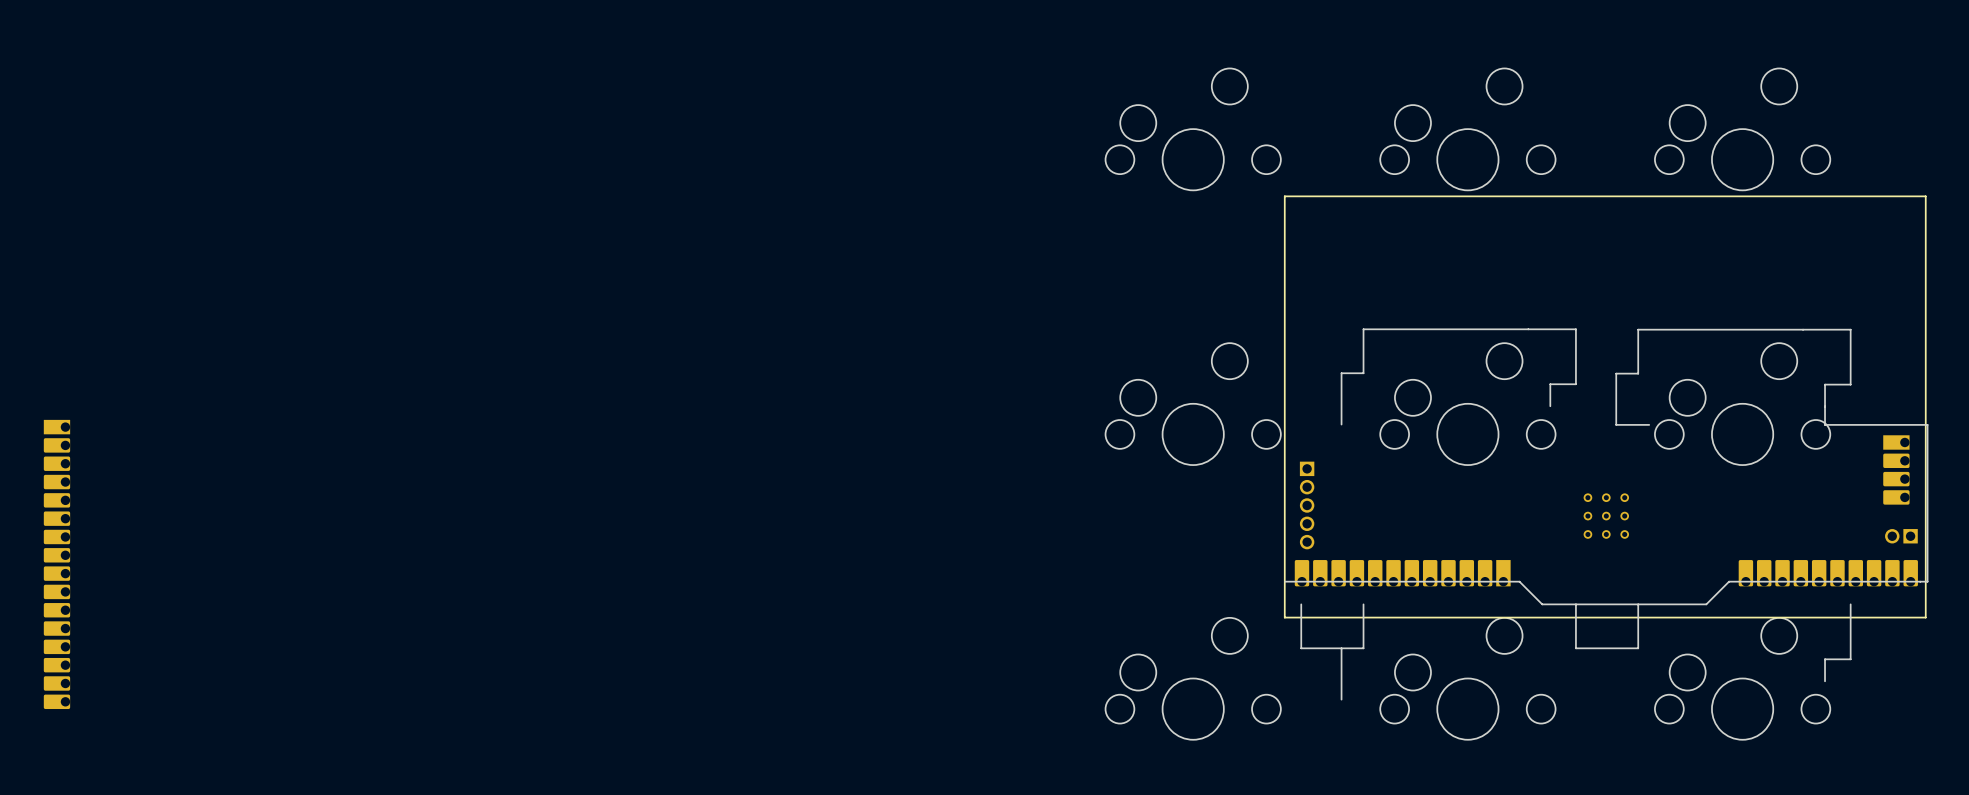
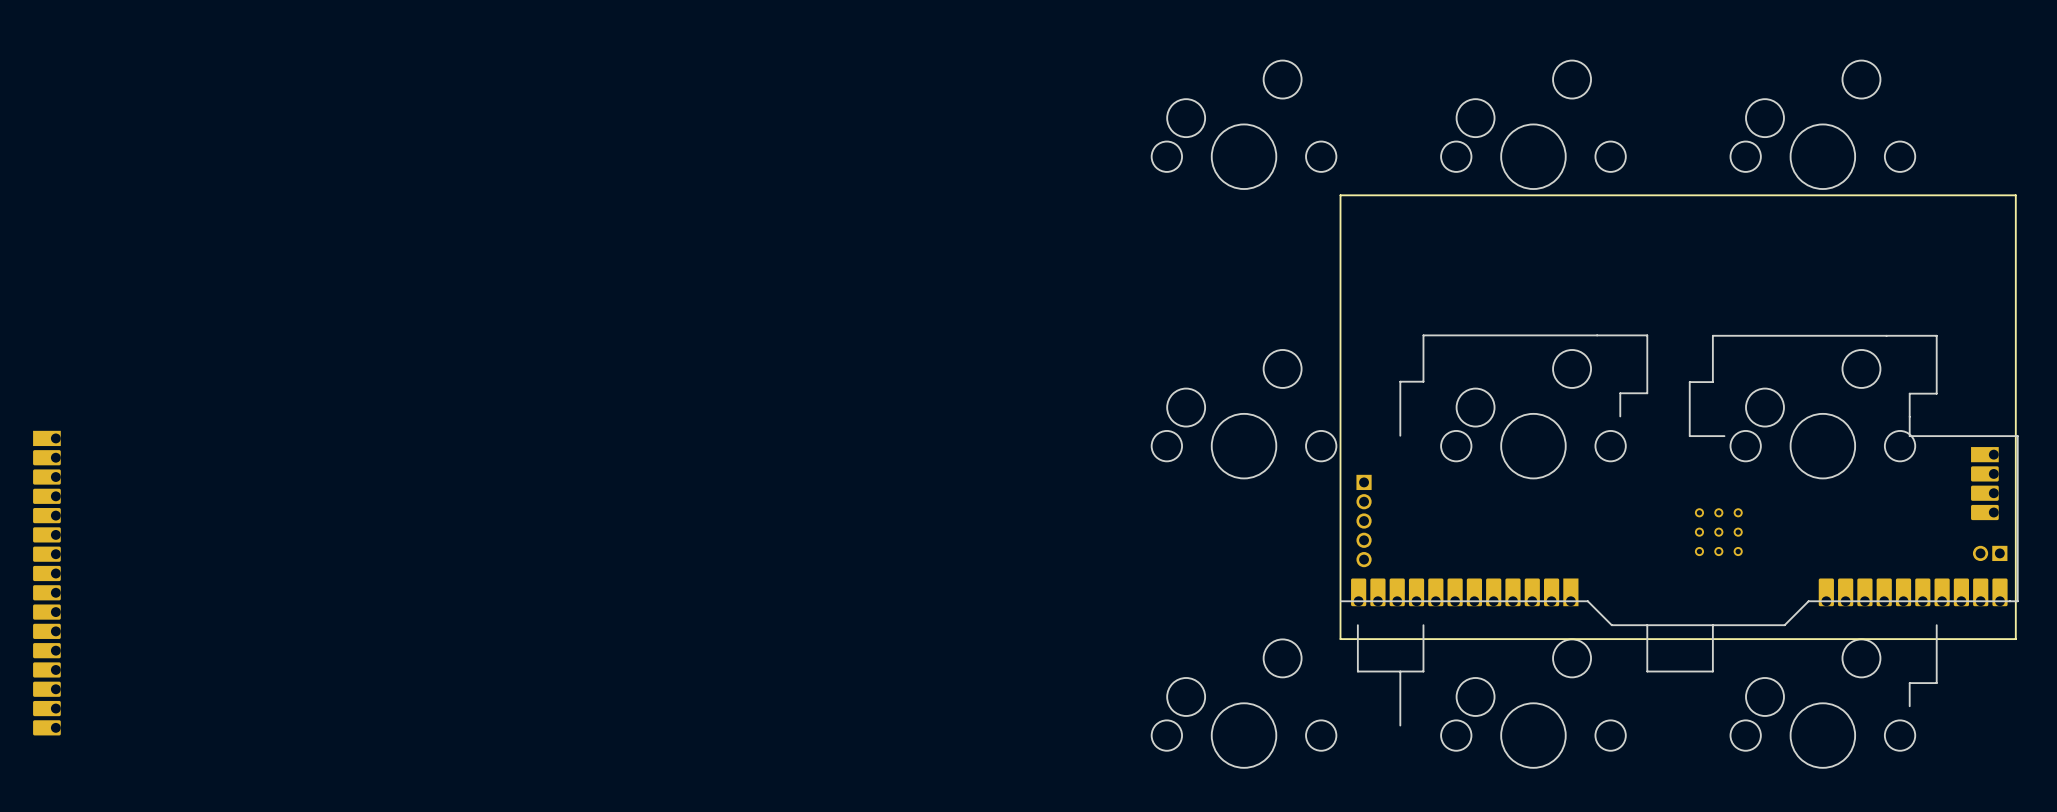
part position: (1606, 516) -> (1718, 532)

